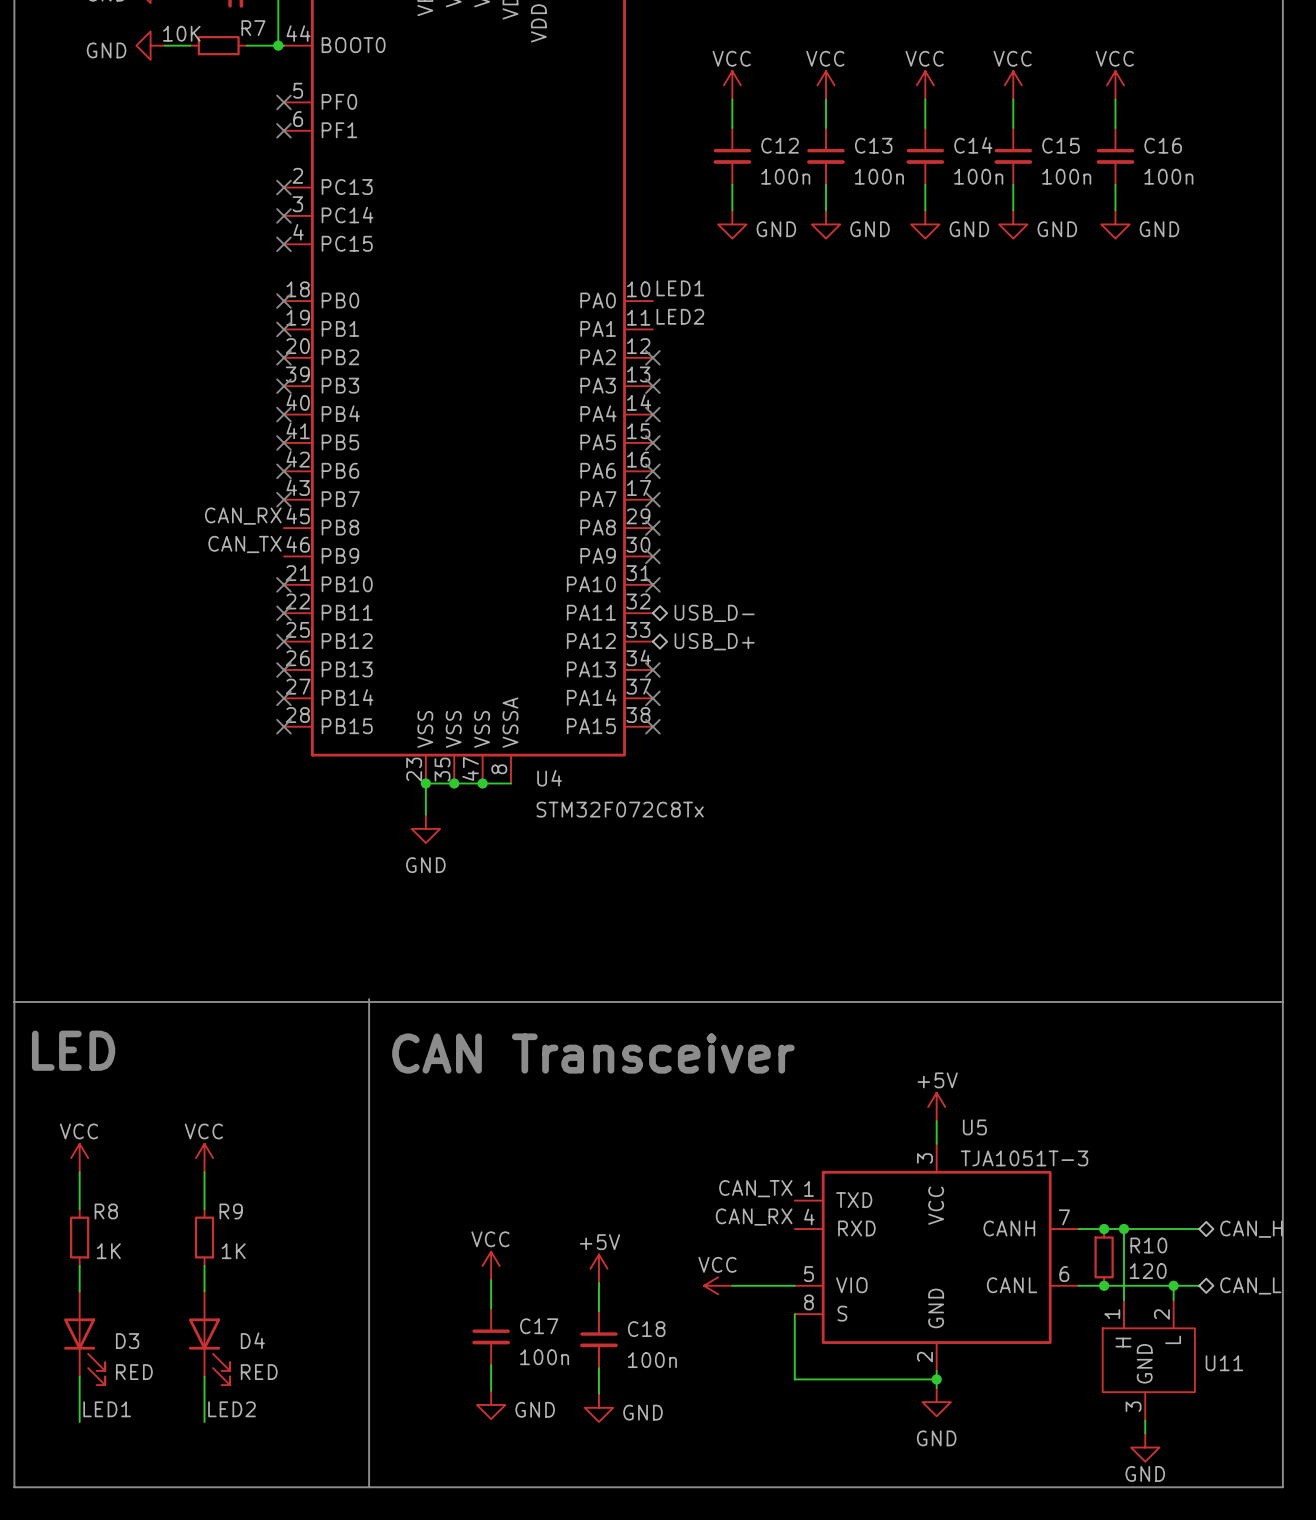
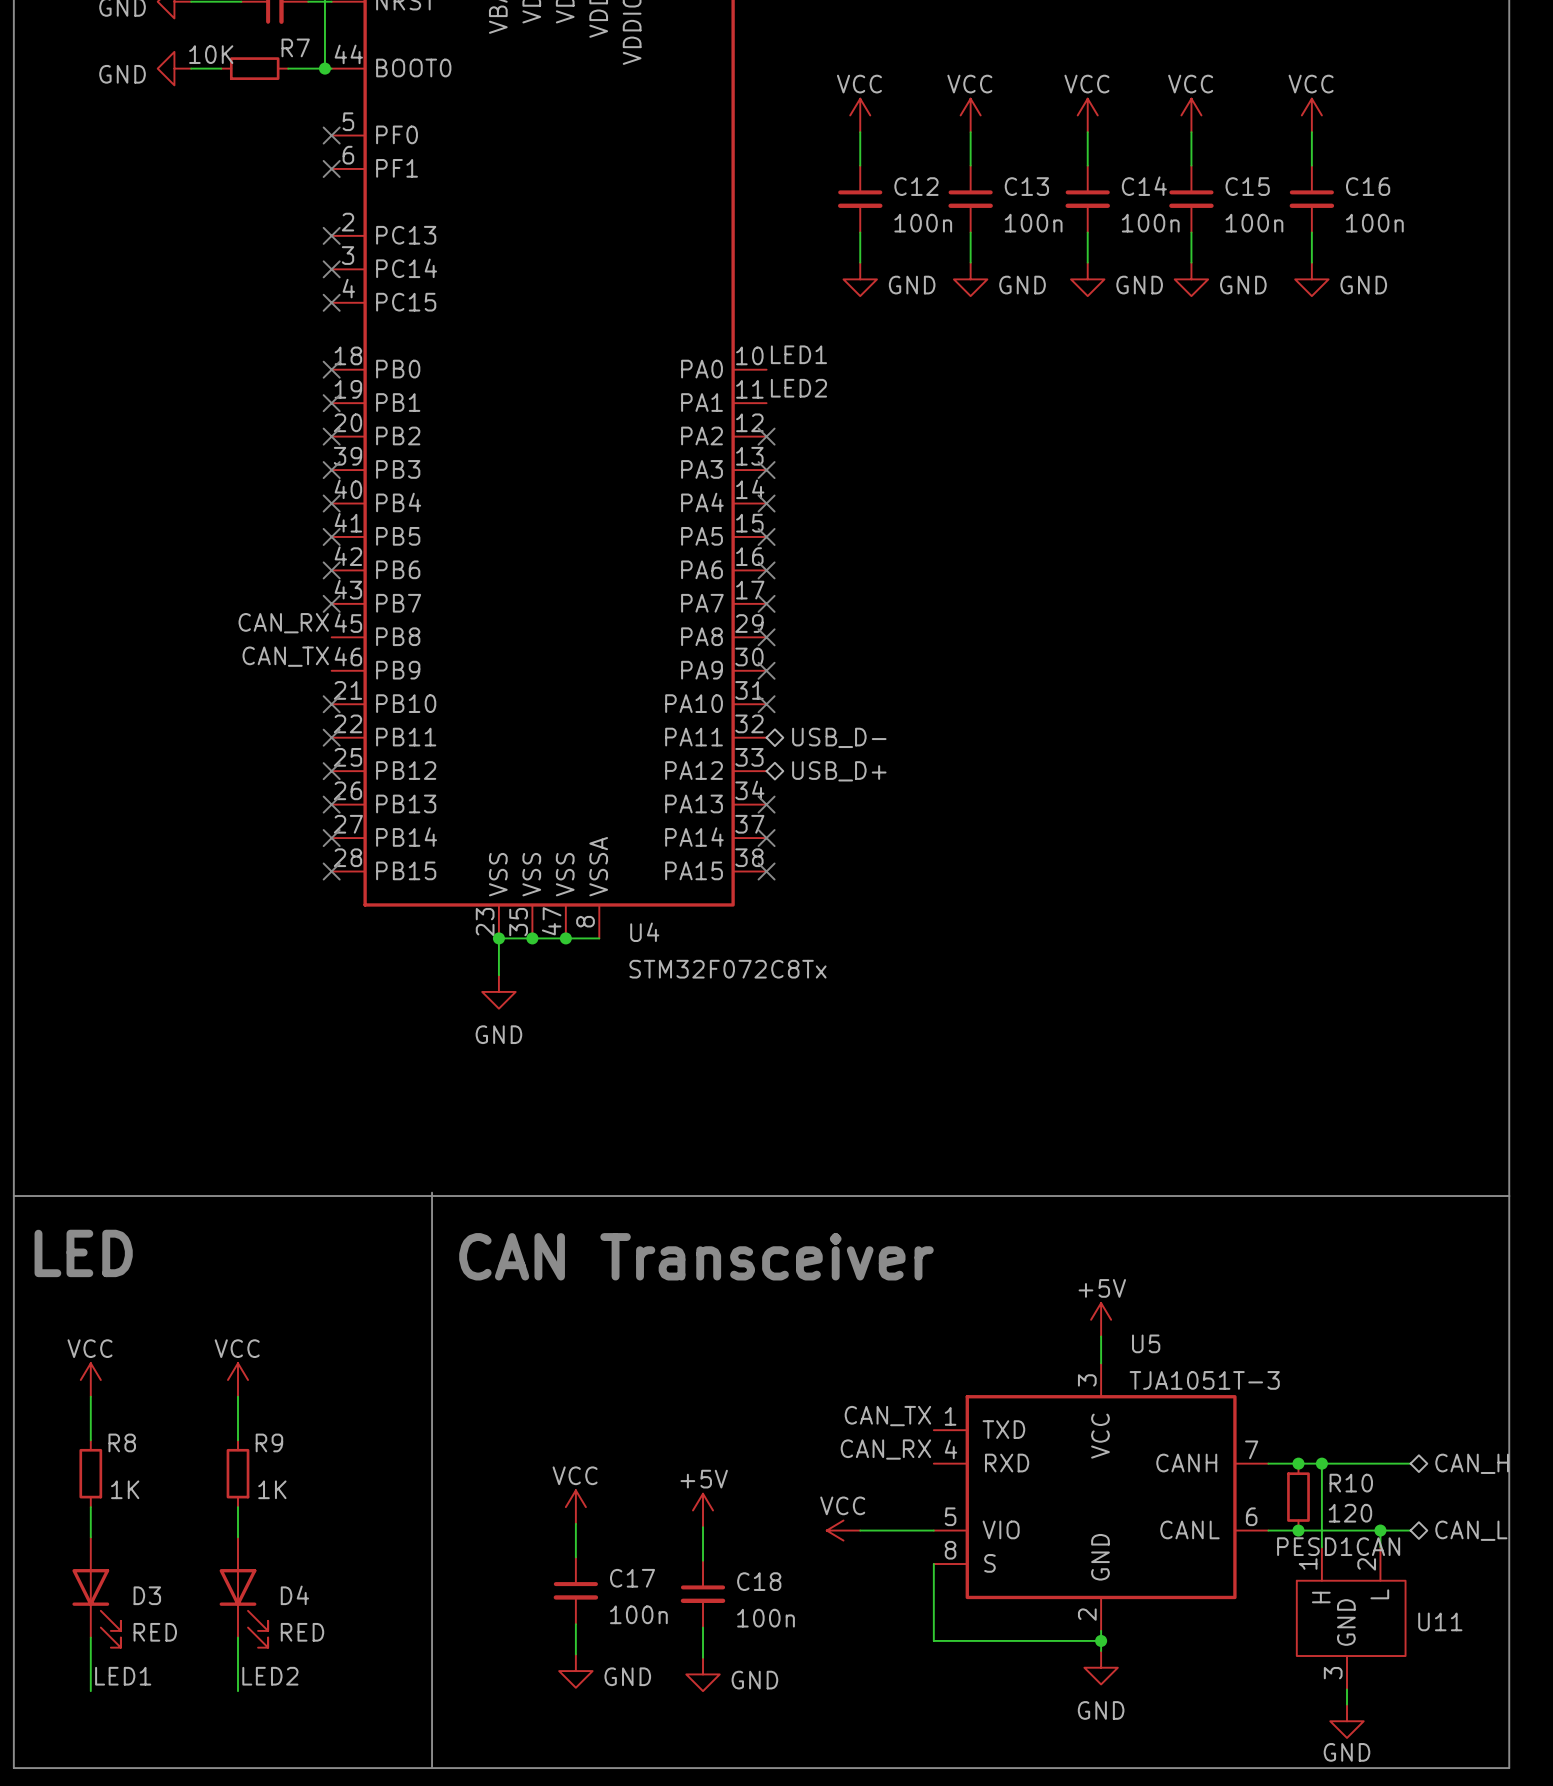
U11 value: none -> PESD1CAN (1338, 1546)

